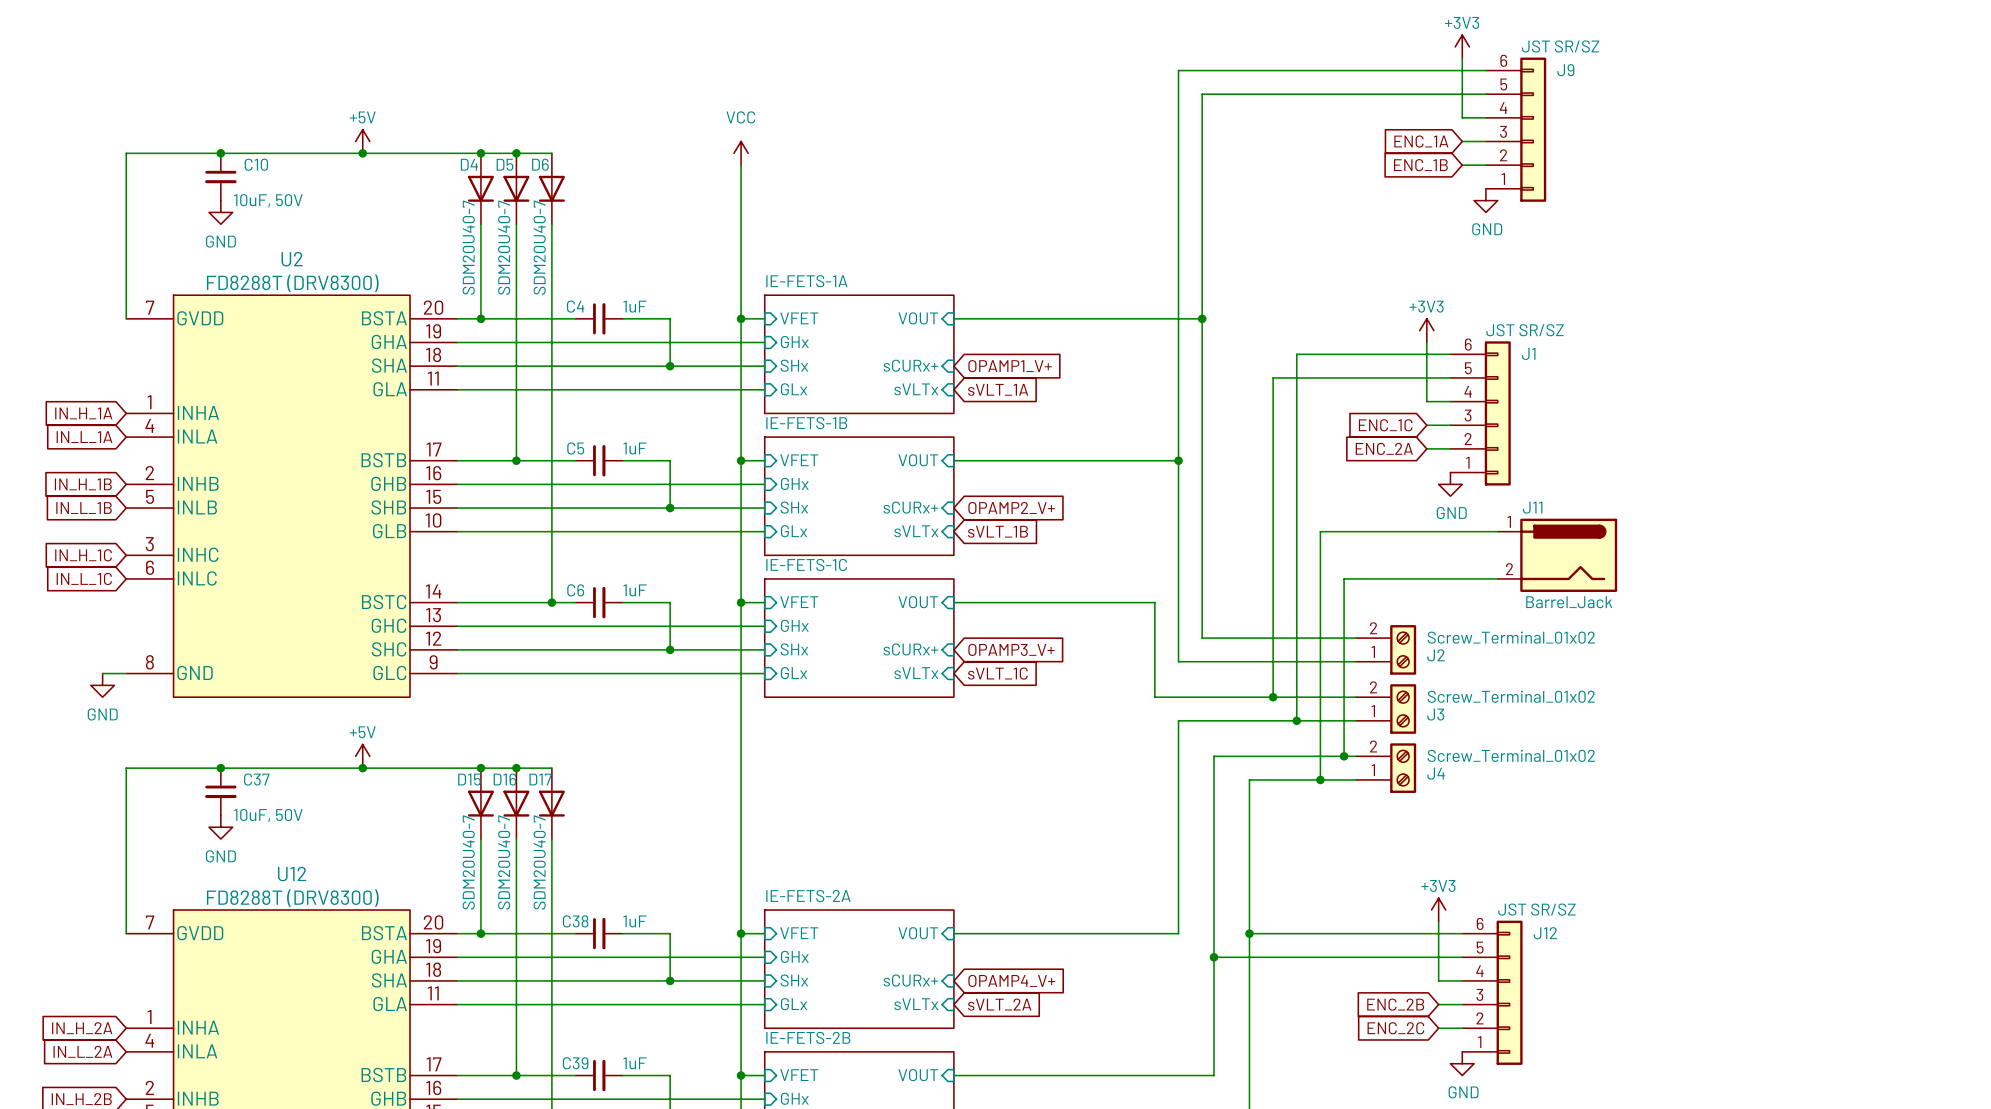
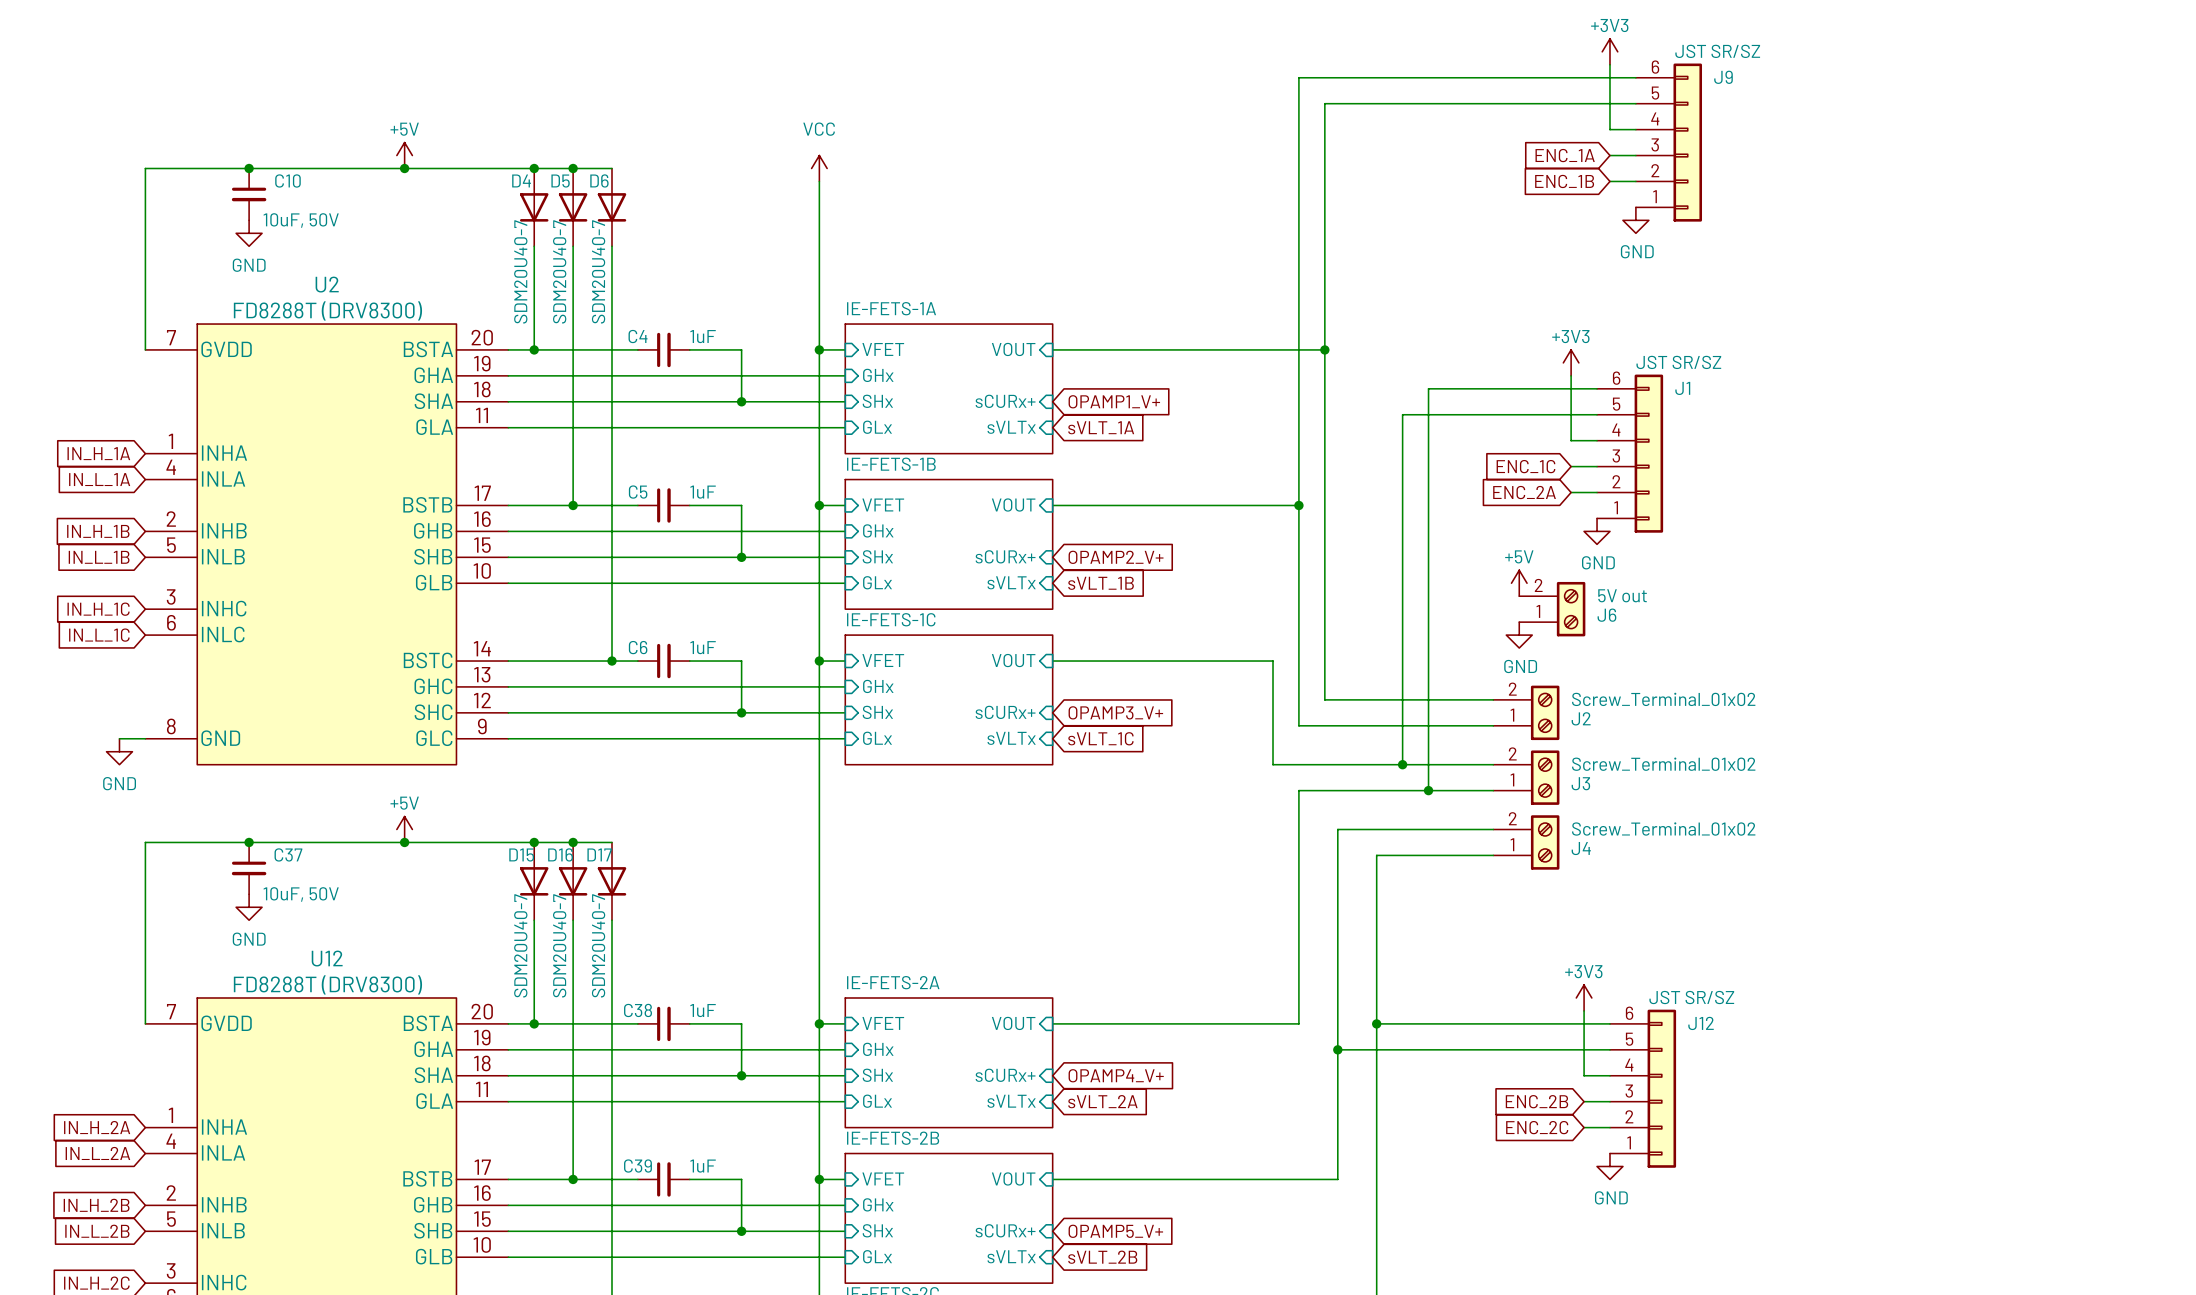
power symbol: none -> +5V (1519, 583)
wire: (1497, 531) (1320, 531) (1320, 779) -> none
J6: none -> 5V out (1552, 609)
J11: Barrel_Jack (1557, 555) -> none
power symbol: none -> GND (1519, 635)
wire: (1497, 578) (1344, 578) (1344, 756) -> none
junction: (1344, 756) -> none
junction: (1320, 779) -> none

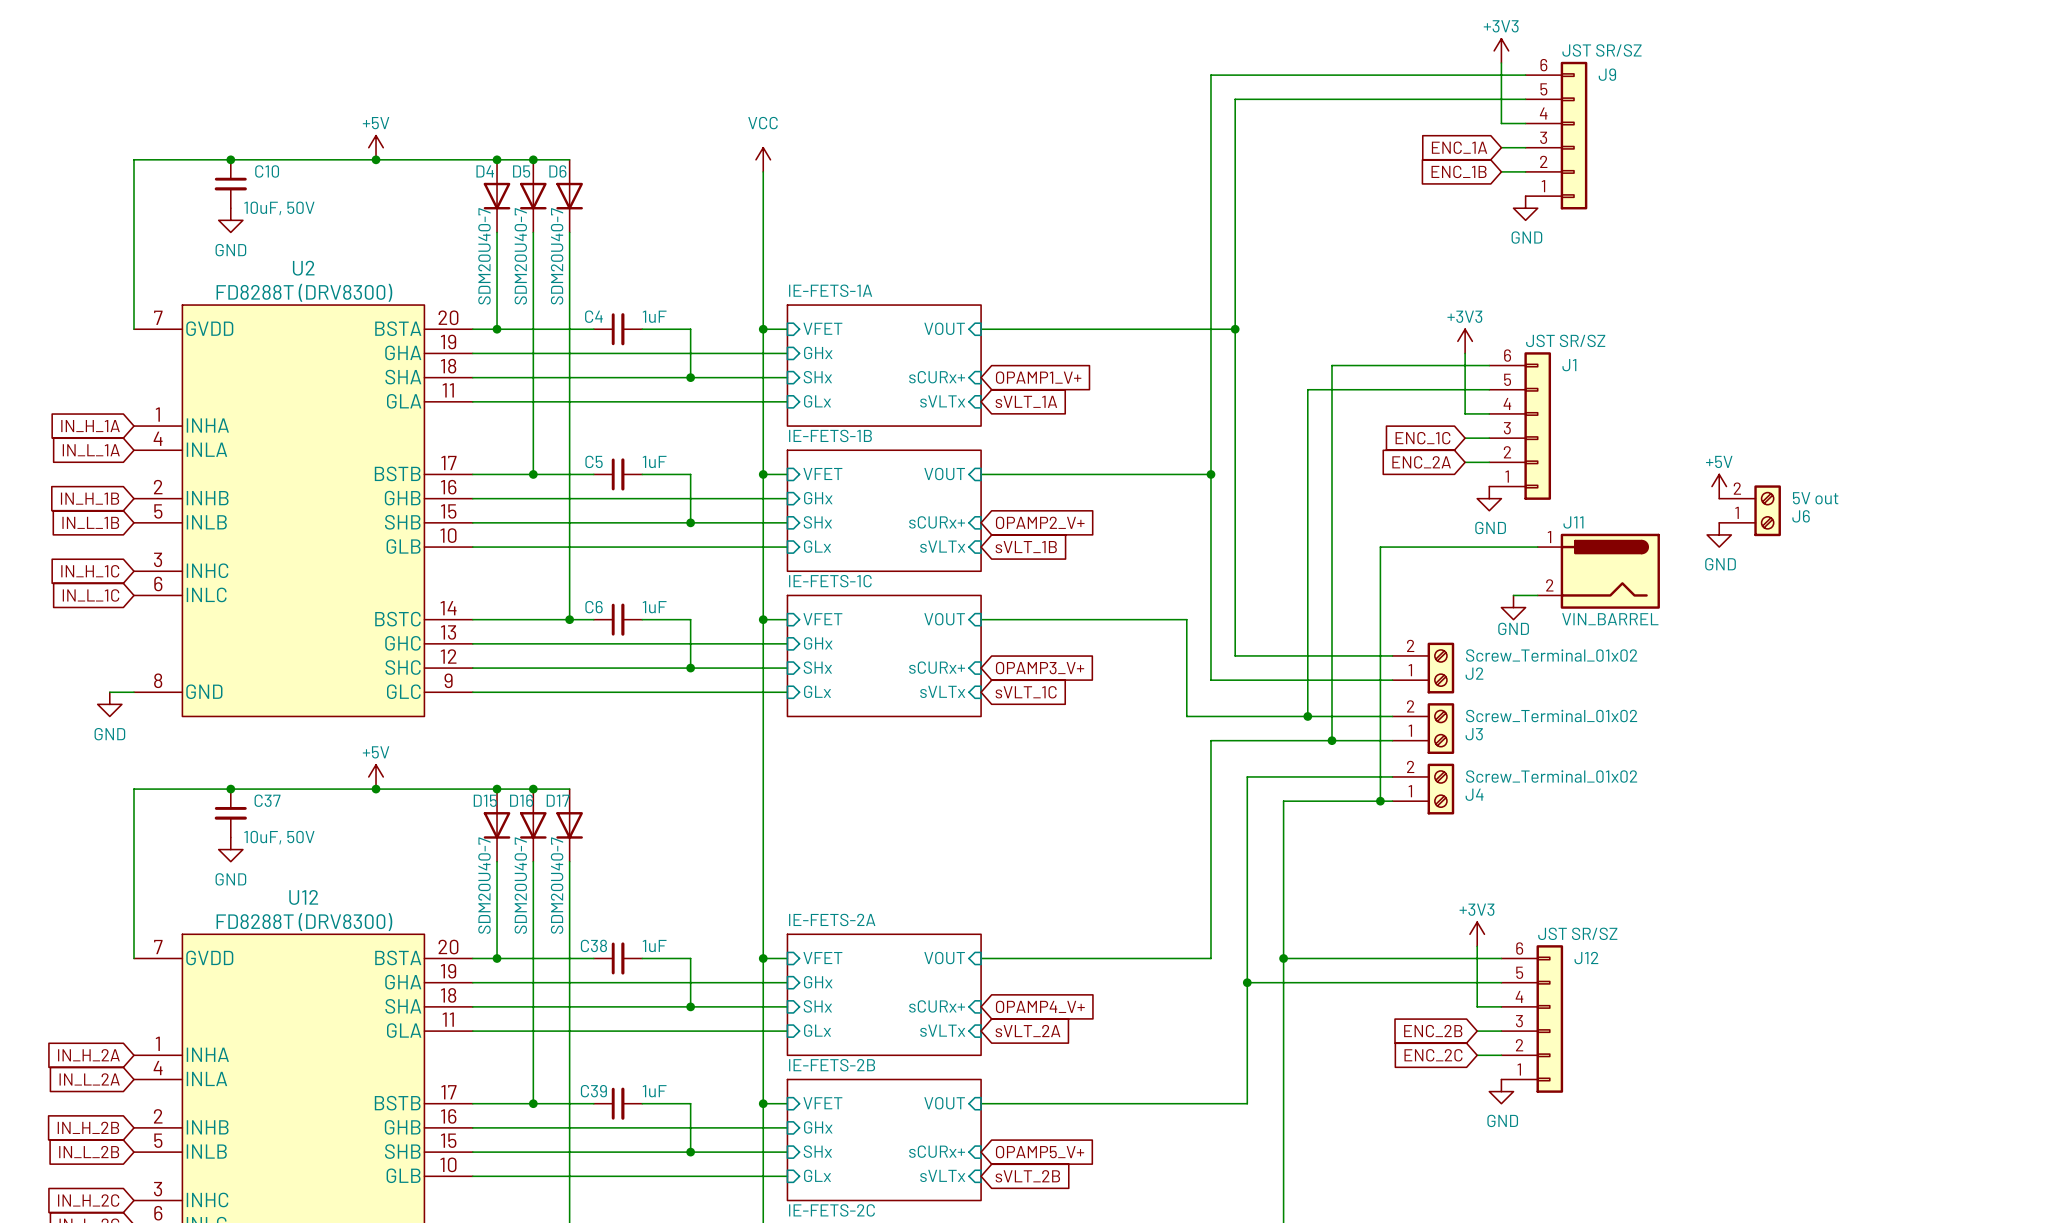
power symbol: none -> +5V (1719, 486)
power symbol: none -> GND (1719, 534)
power symbol: +5V (1519, 583) -> none
wire: none -> (1537, 547) (1380, 547) (1380, 801)
J6 position: (1552, 609) -> (1750, 510)
J11: none -> VIN_BARREL (1598, 571)
power symbol position: GND (1519, 635) -> GND (1513, 607)
wire: none -> (1513, 595) (1537, 595)
power symbol text position: GND (1520, 666) -> GND (1513, 628)
junction: none -> (1380, 801)

